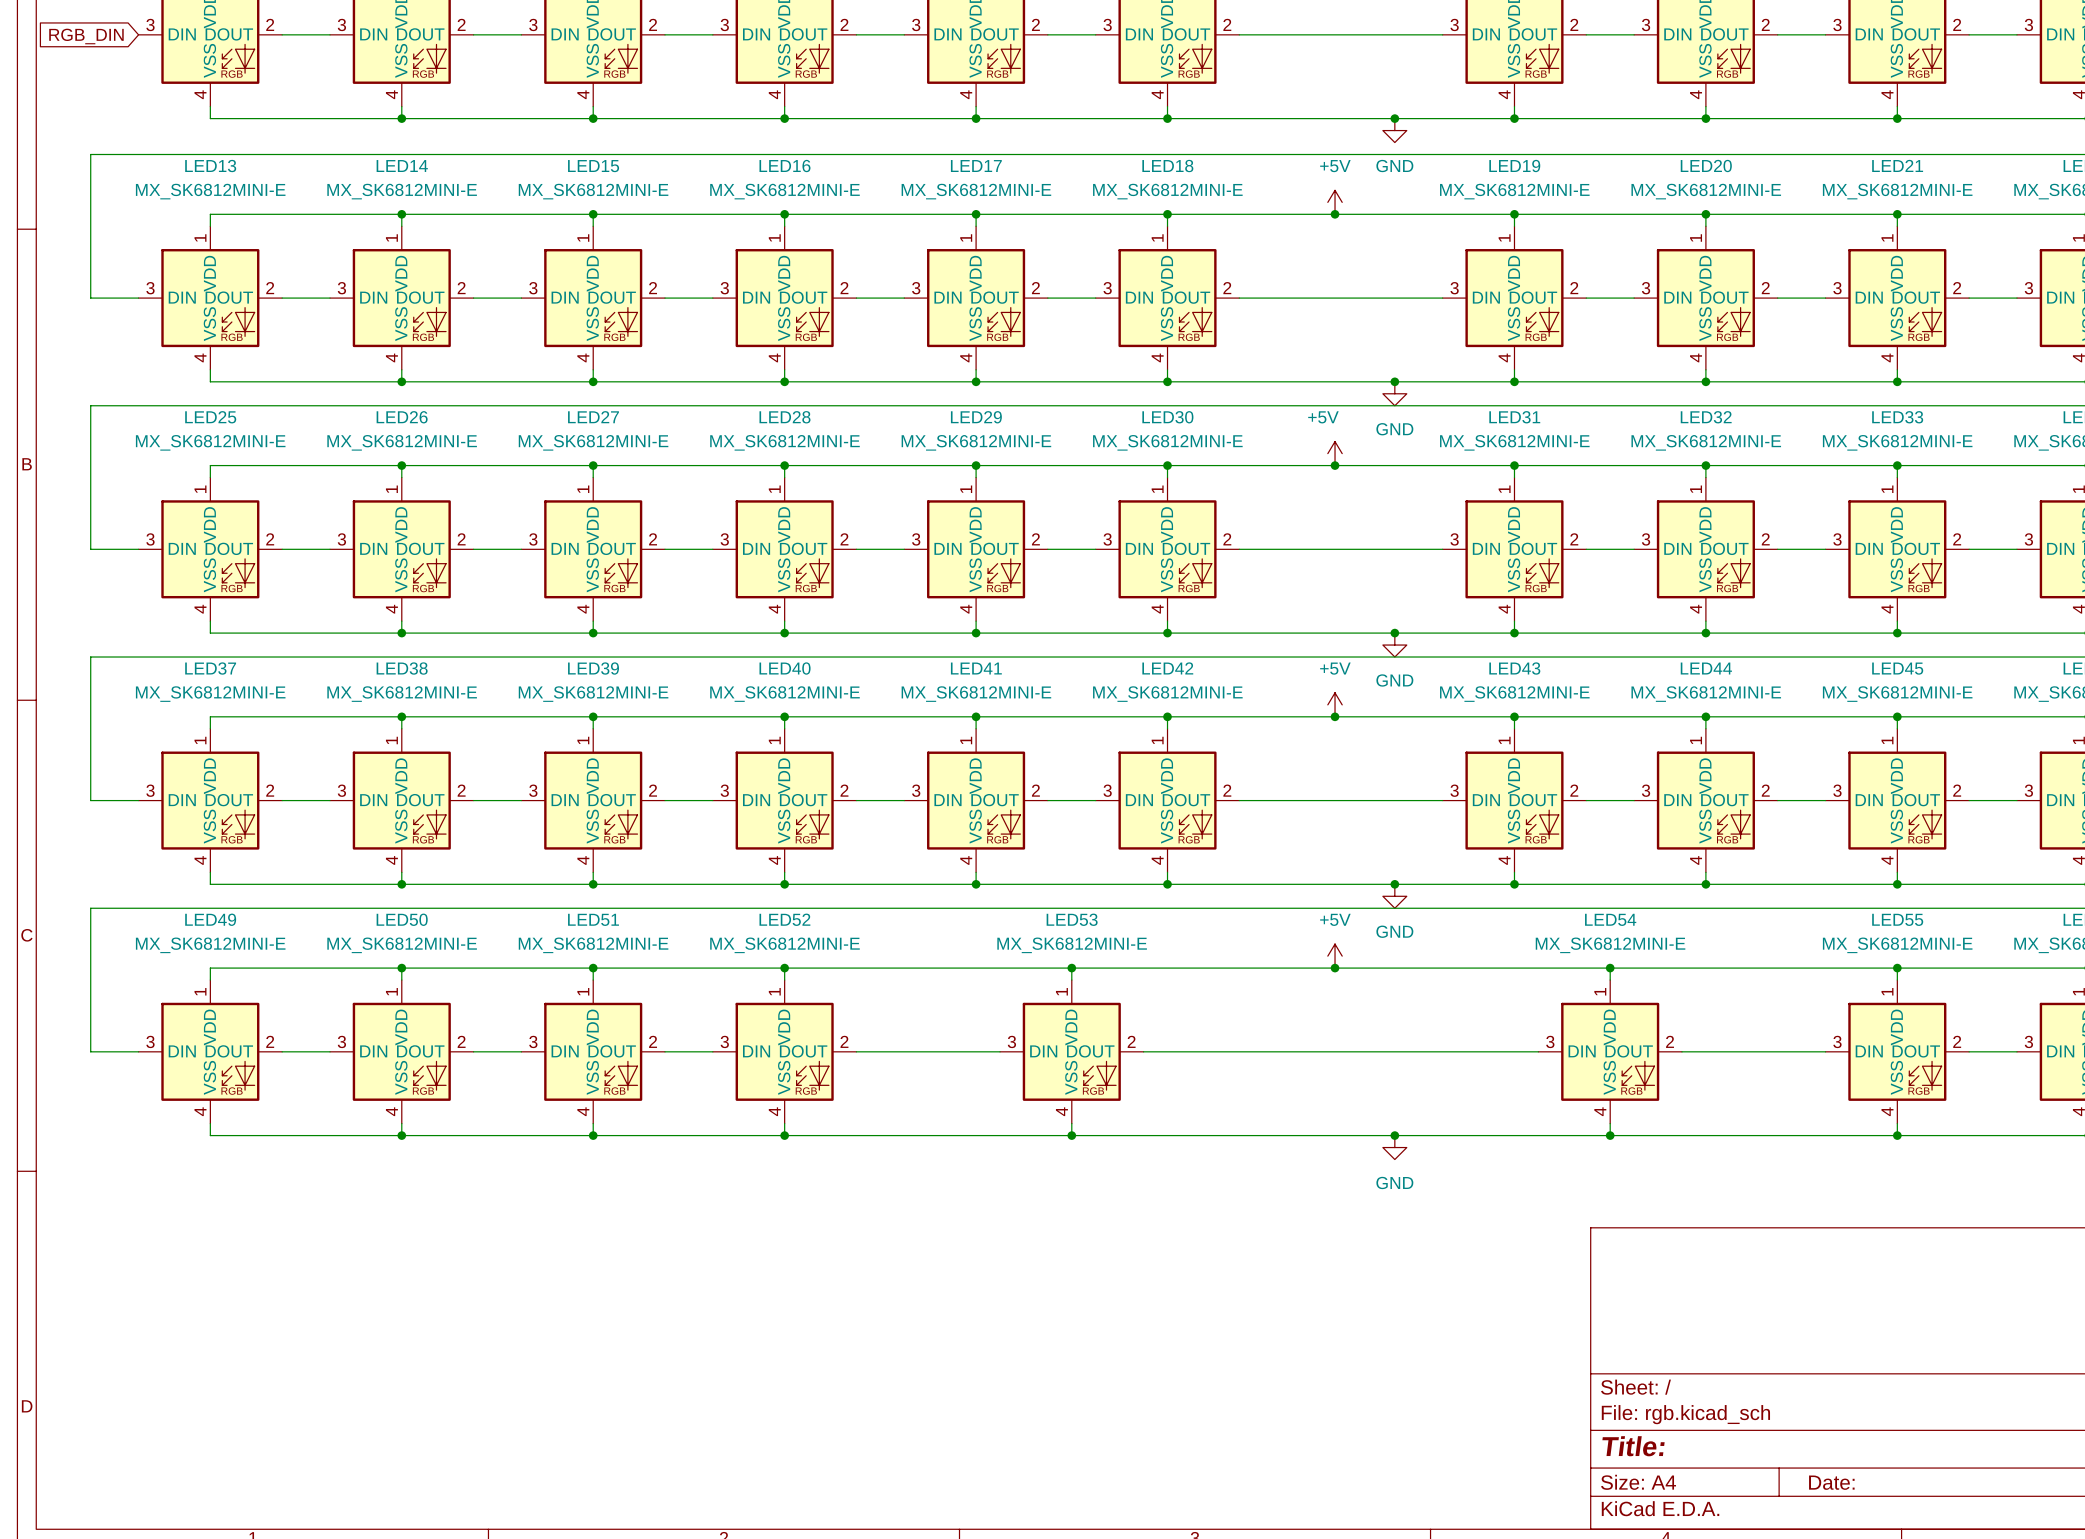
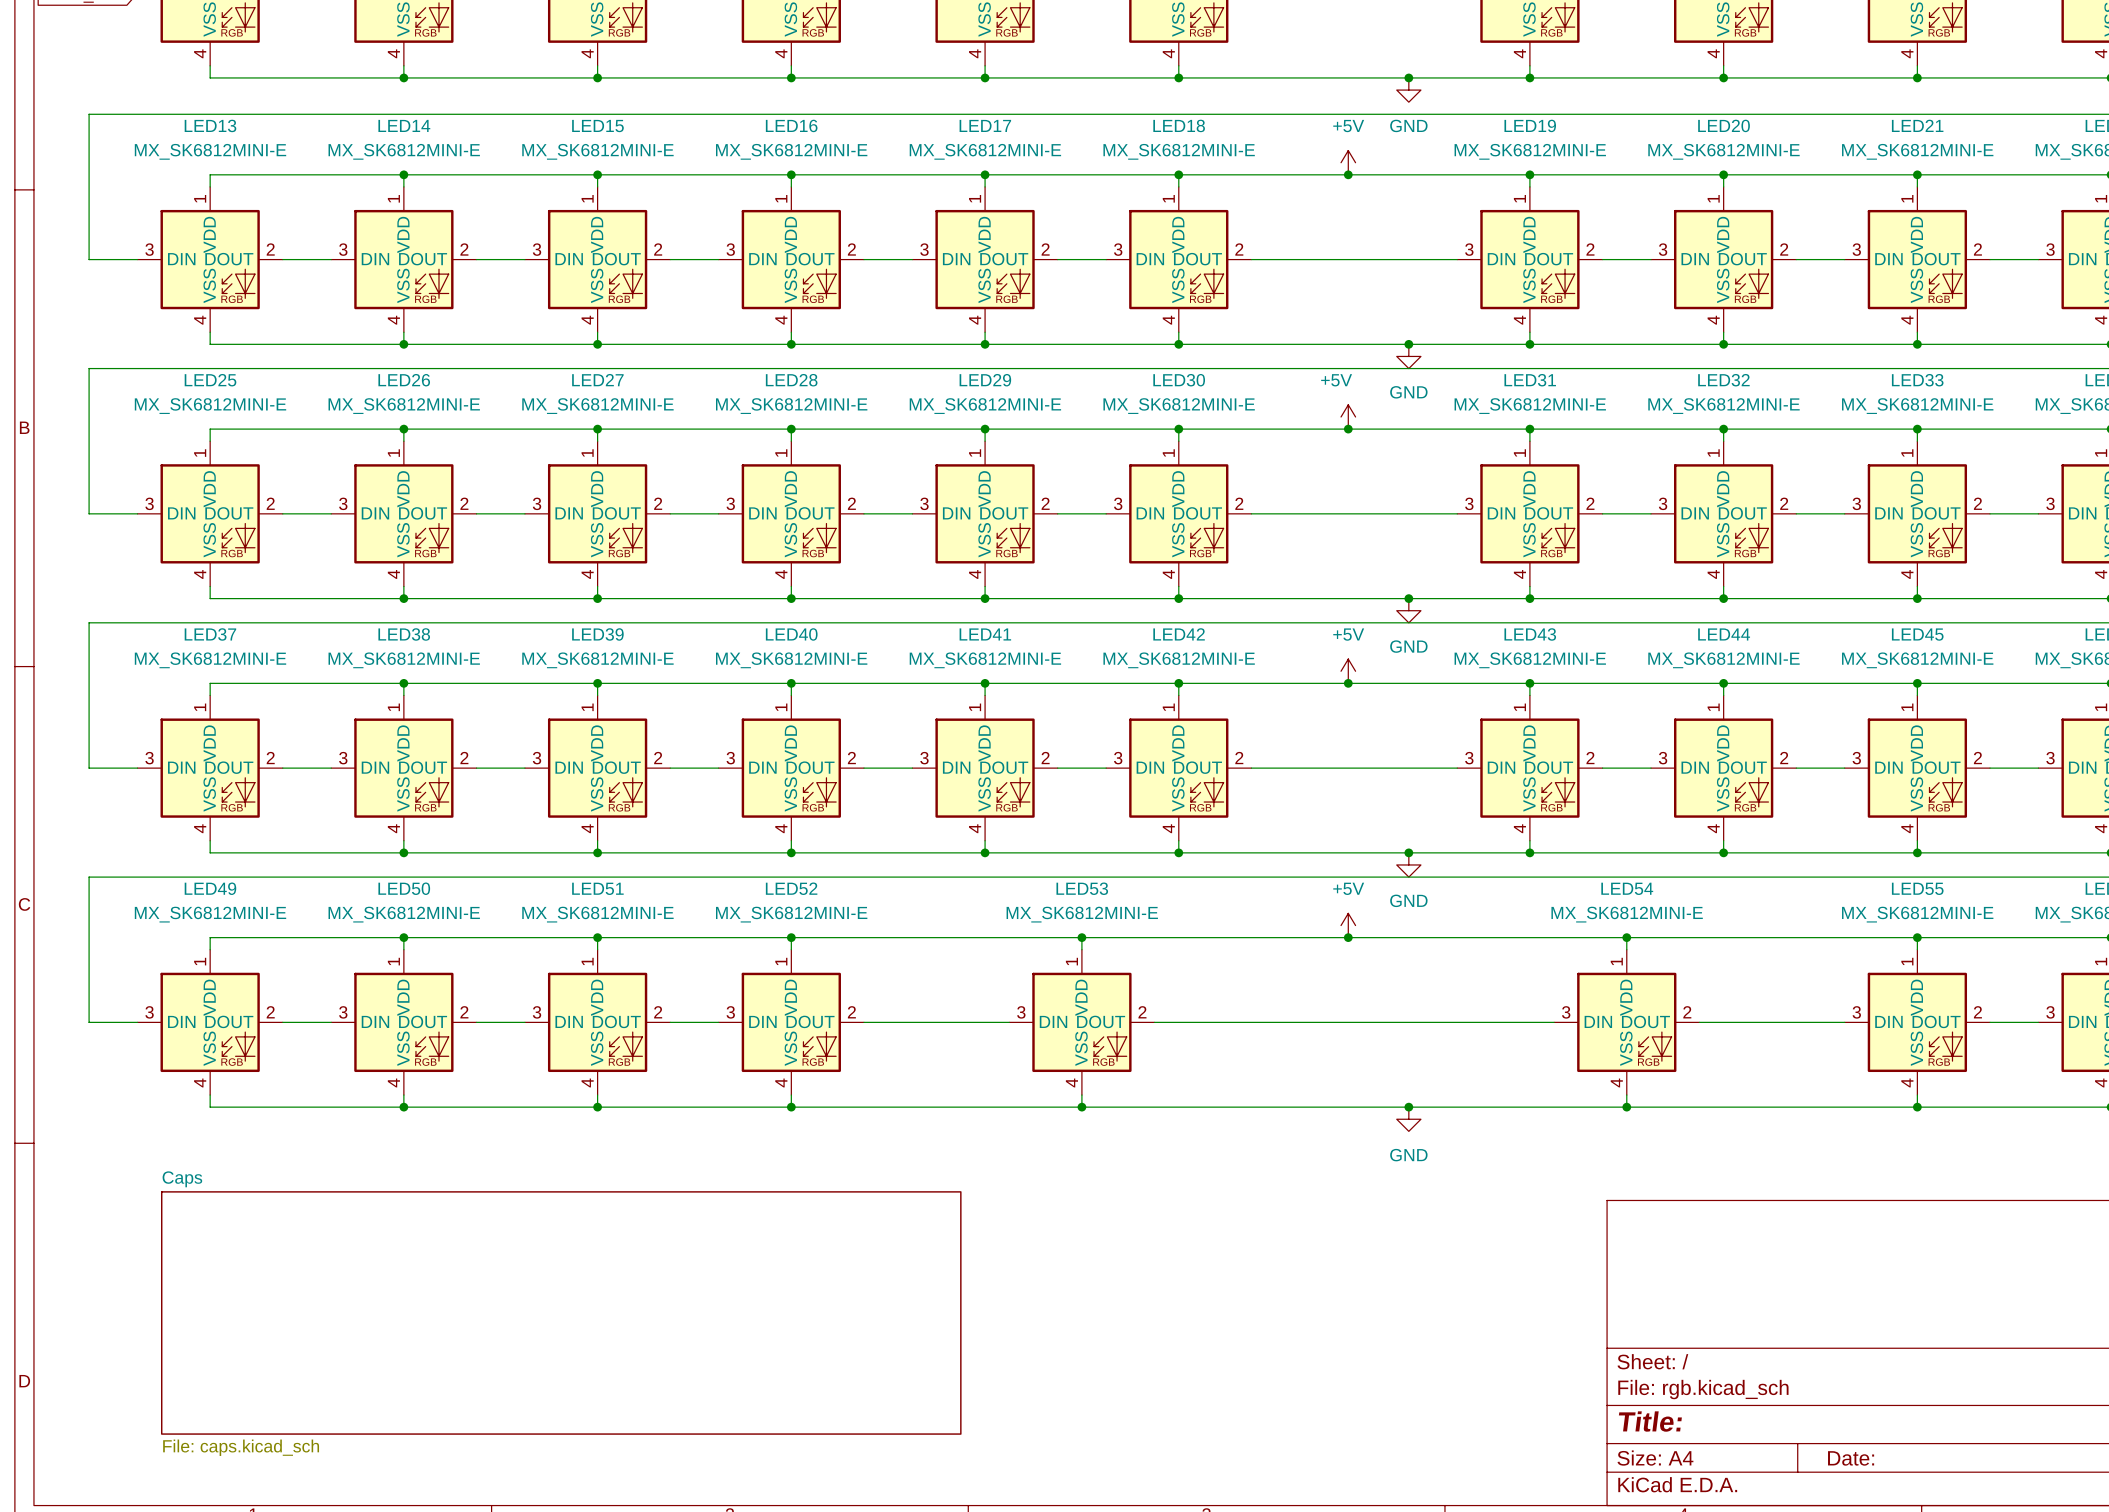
sheet Caps: none -> File: caps.kicad_sch (561, 1312)

